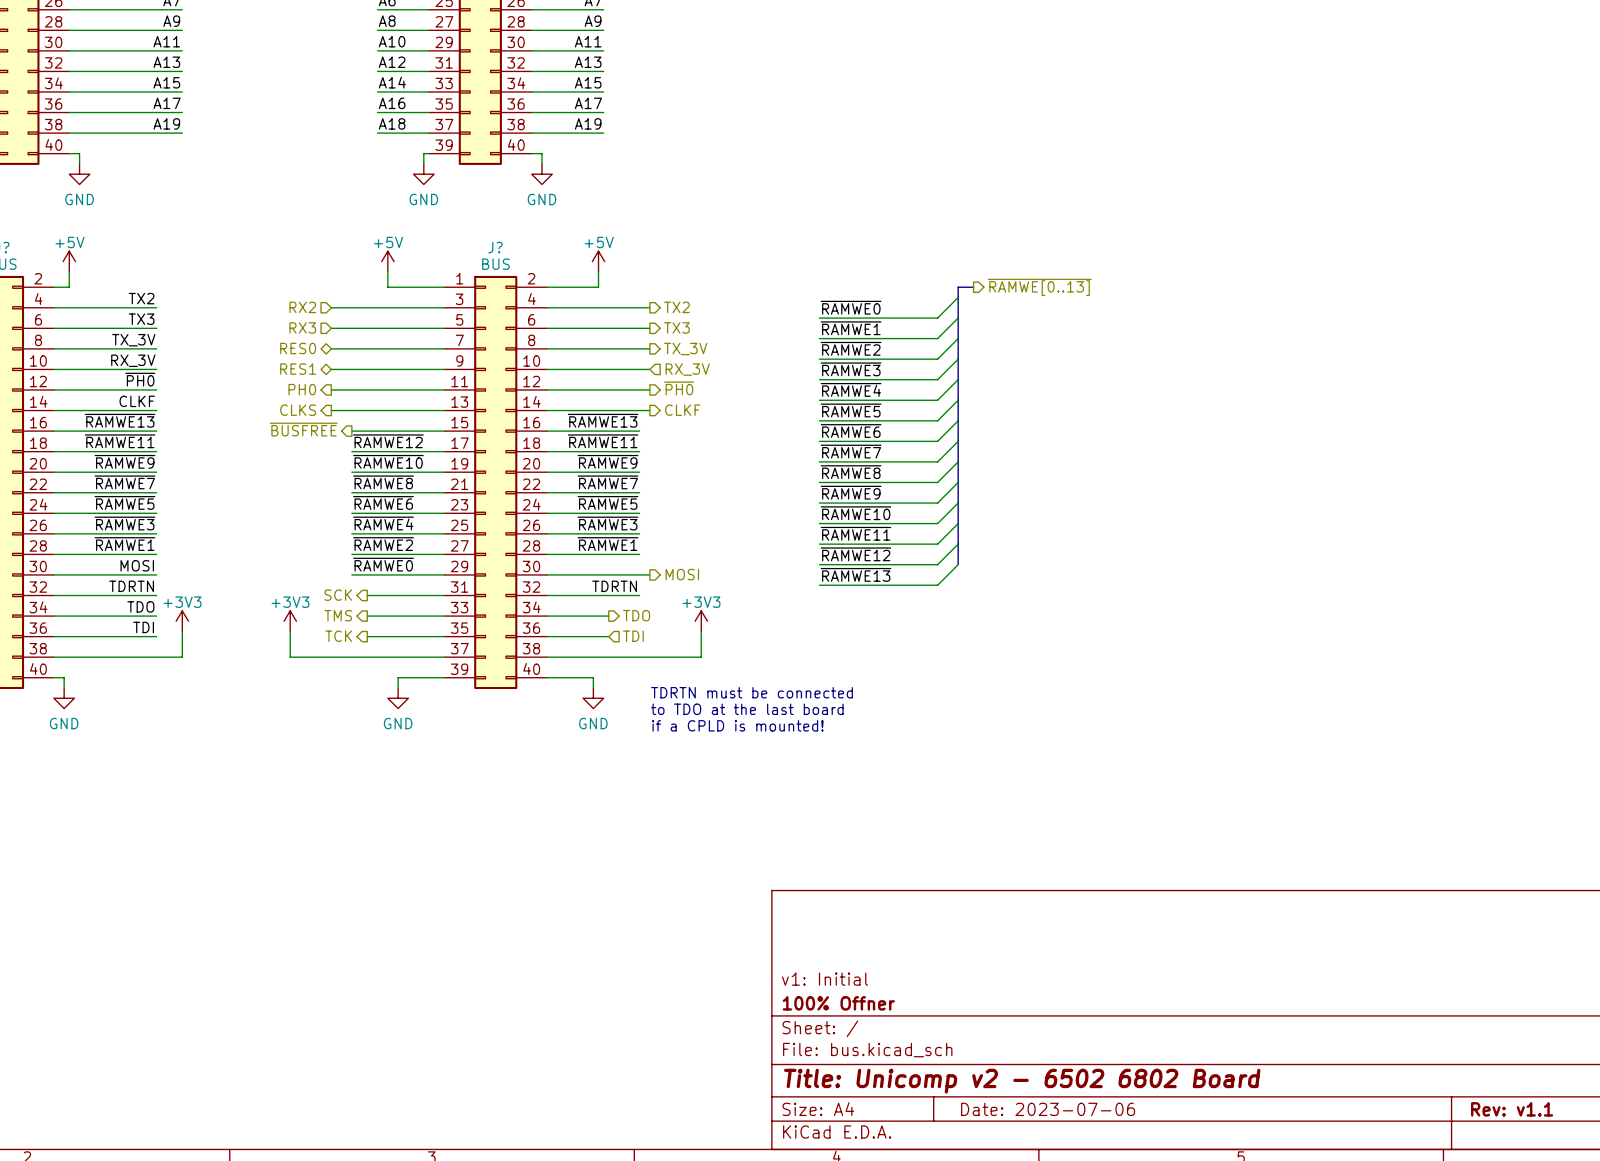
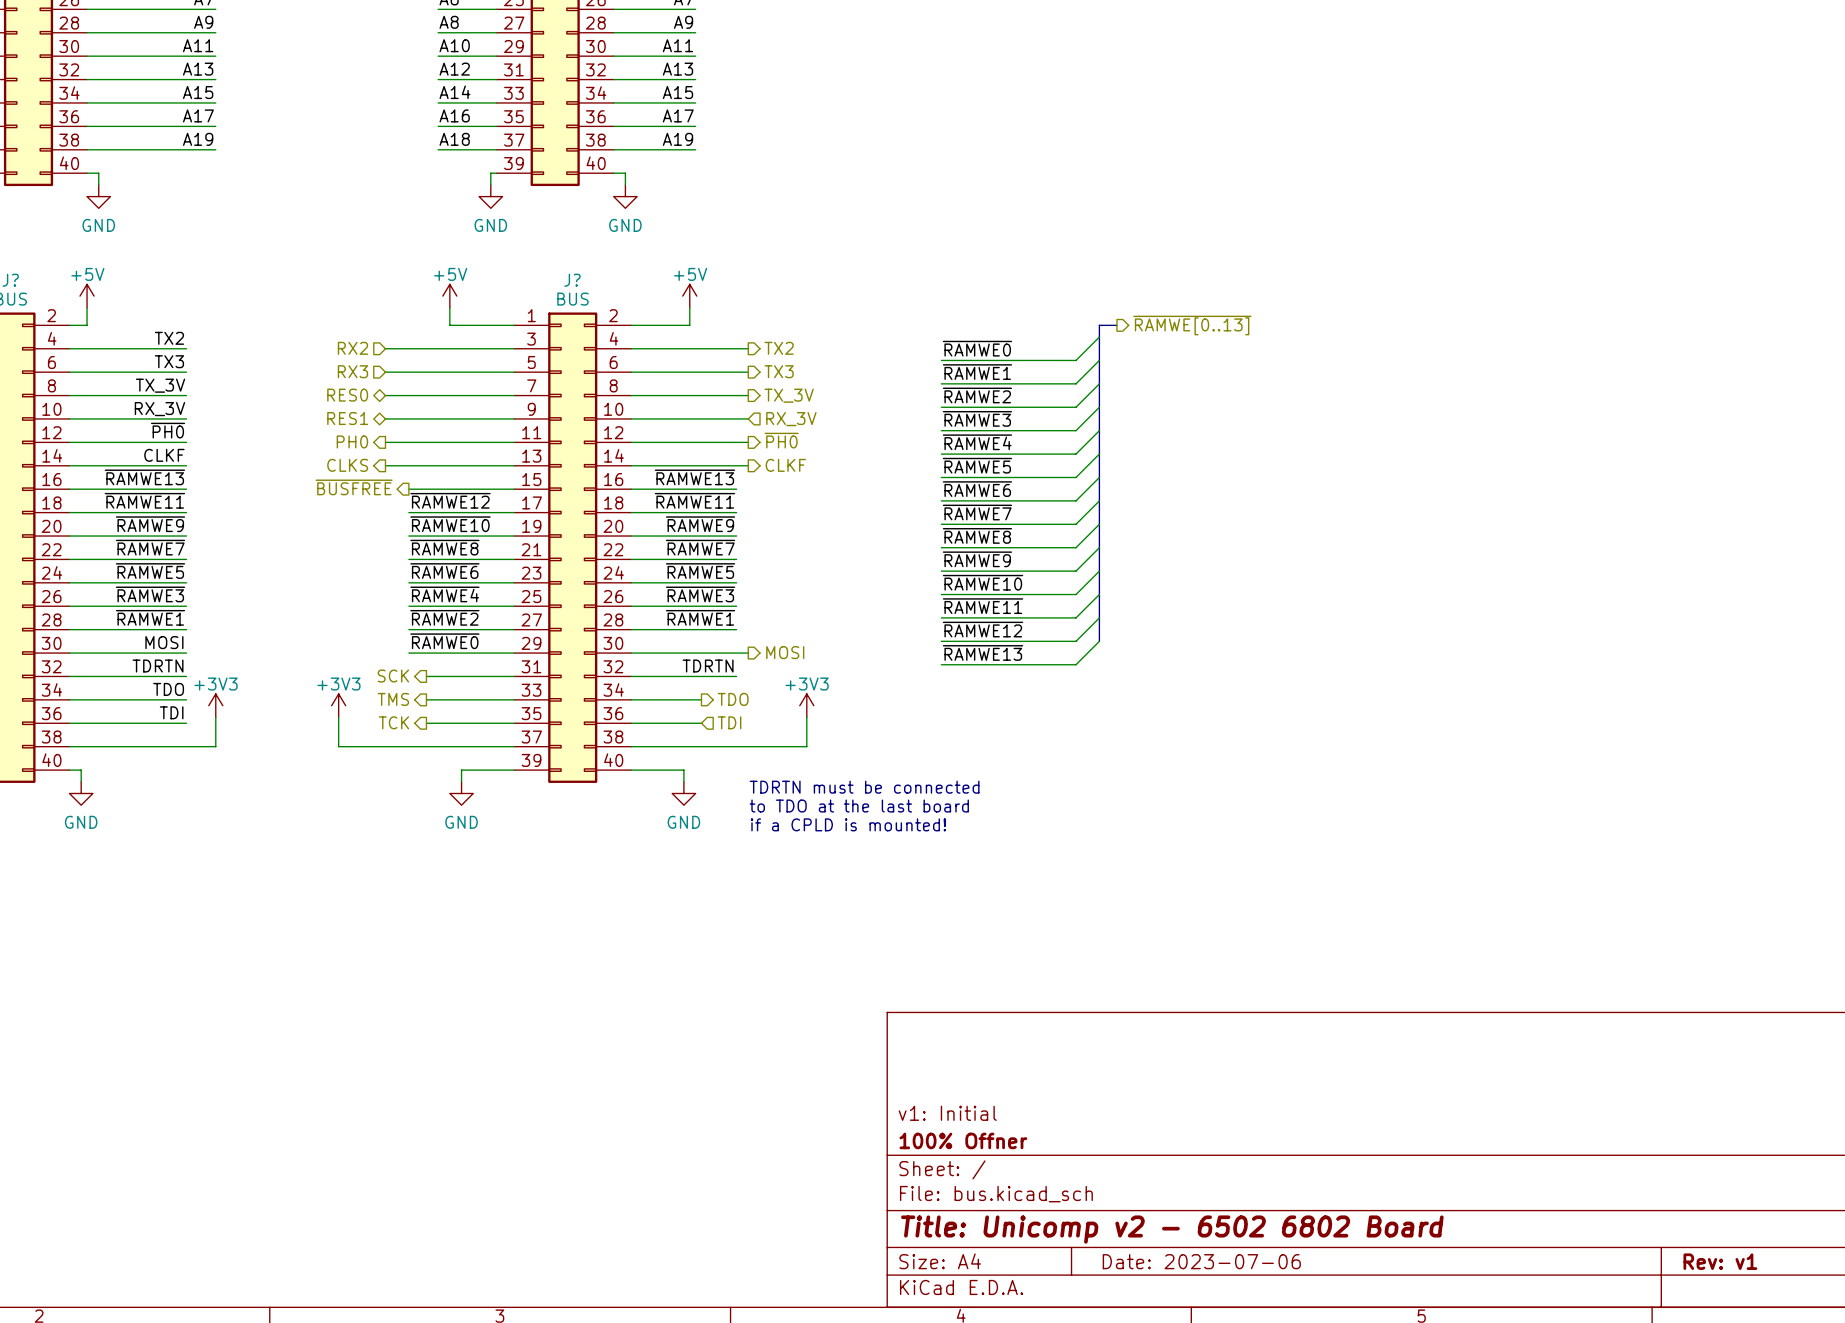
title block: Rev: v1.1 (1512, 1109) -> Rev: v1 (1720, 1261)

